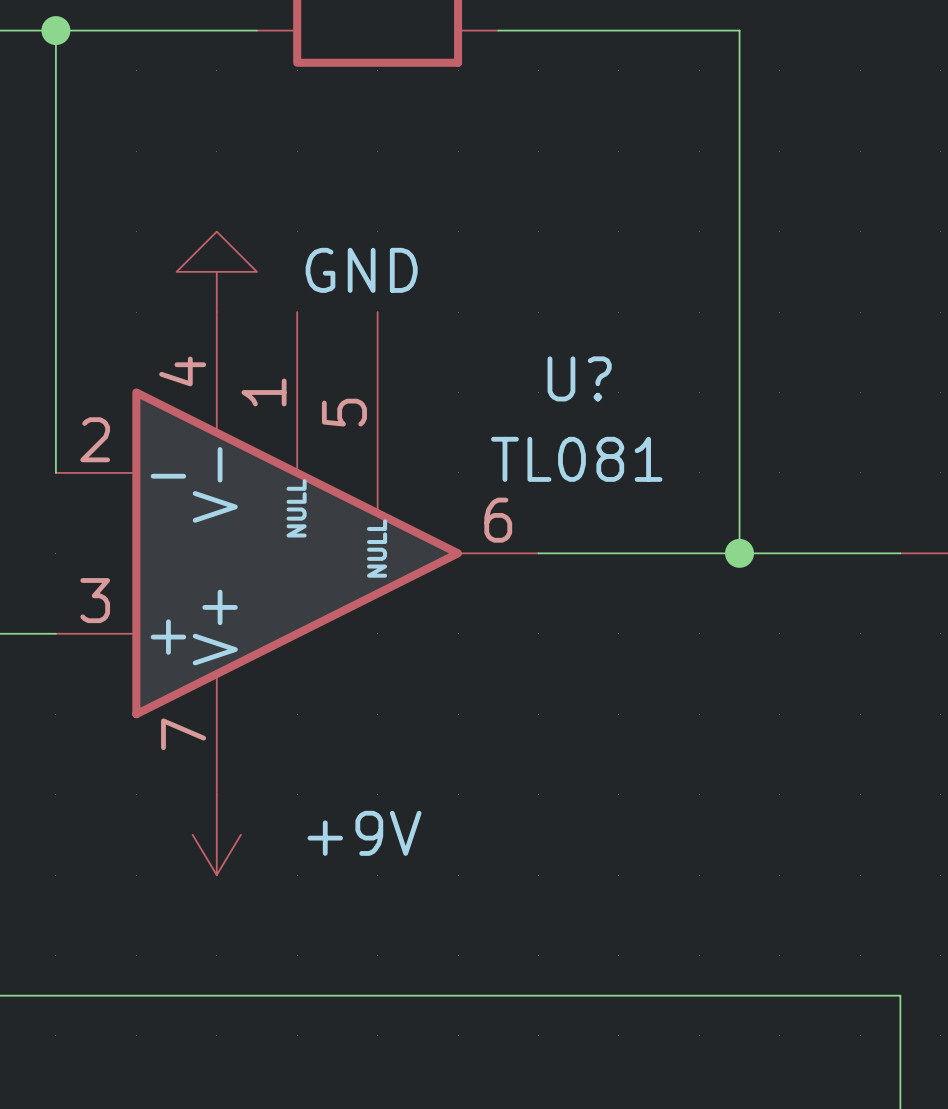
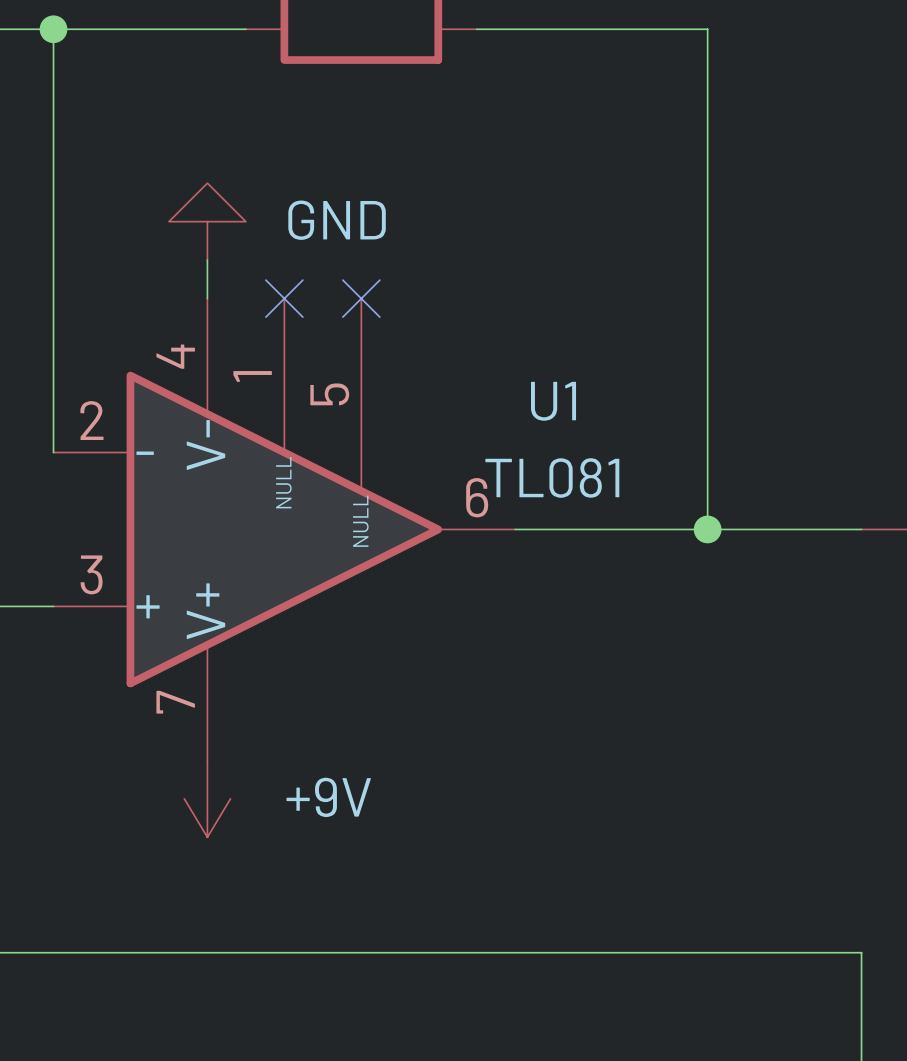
power symbol position: GND (216, 271) -> GND (207, 221)
no-connect mark: none -> (284, 298)
no-connect mark: none -> (361, 298)
U? name: U? (579, 378) -> U1 (553, 401)
U? value position: TL081 (576, 459) -> TL081 (552, 478)

